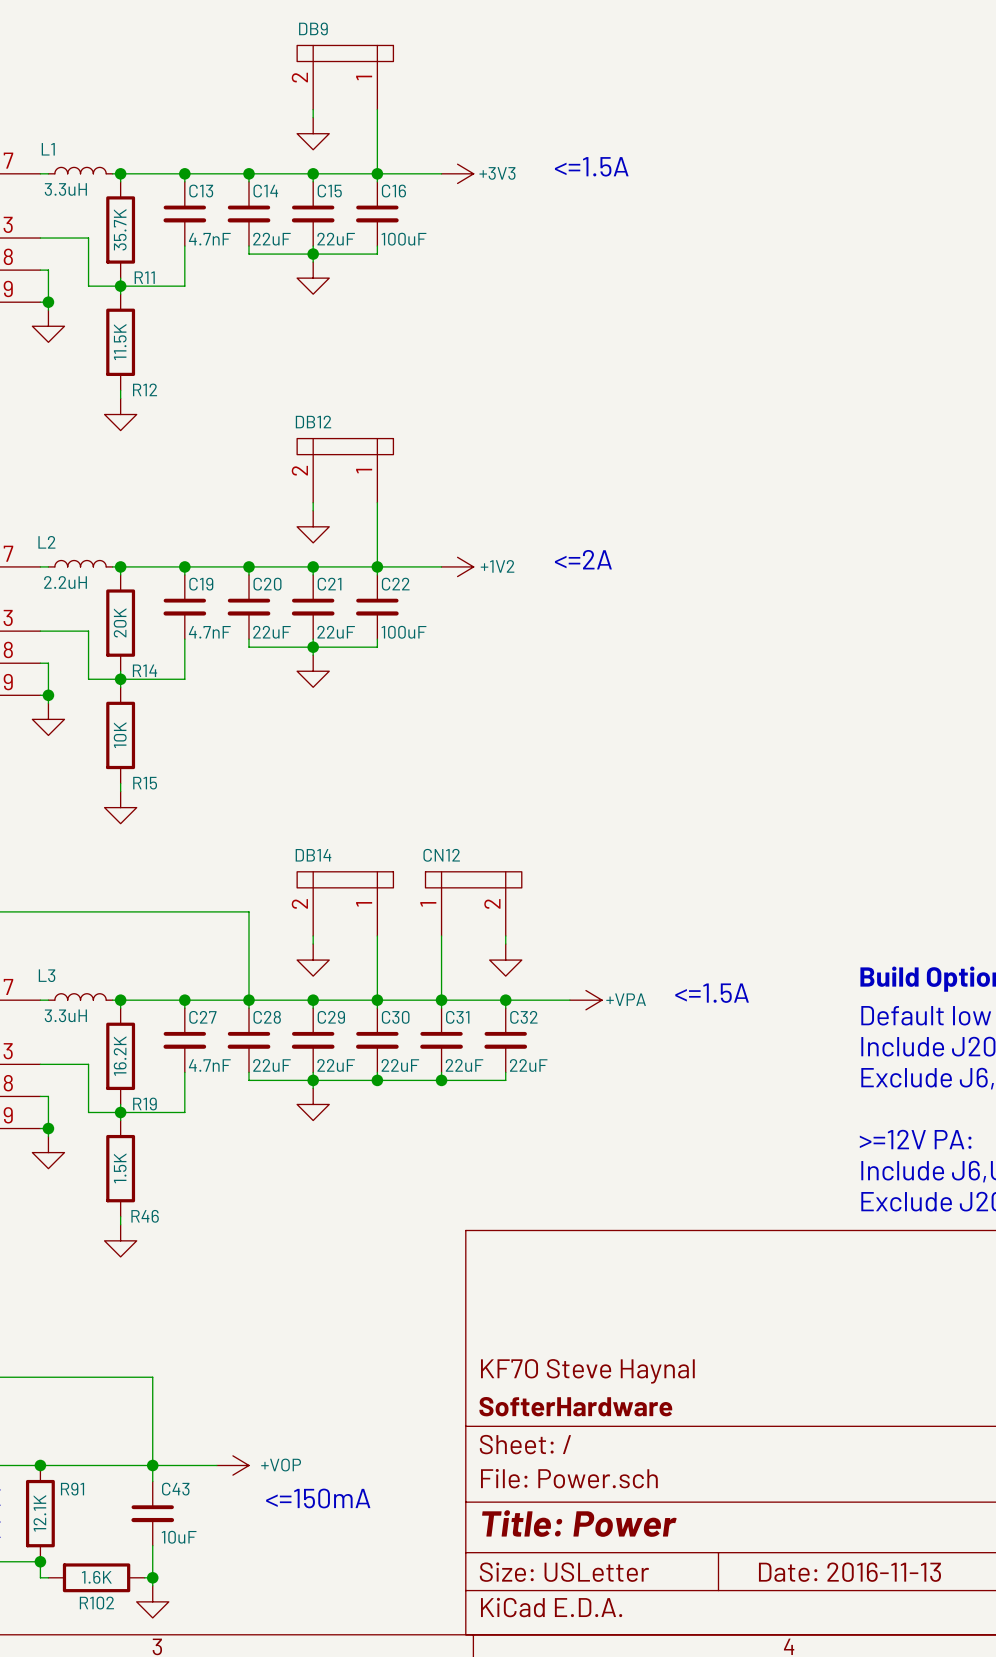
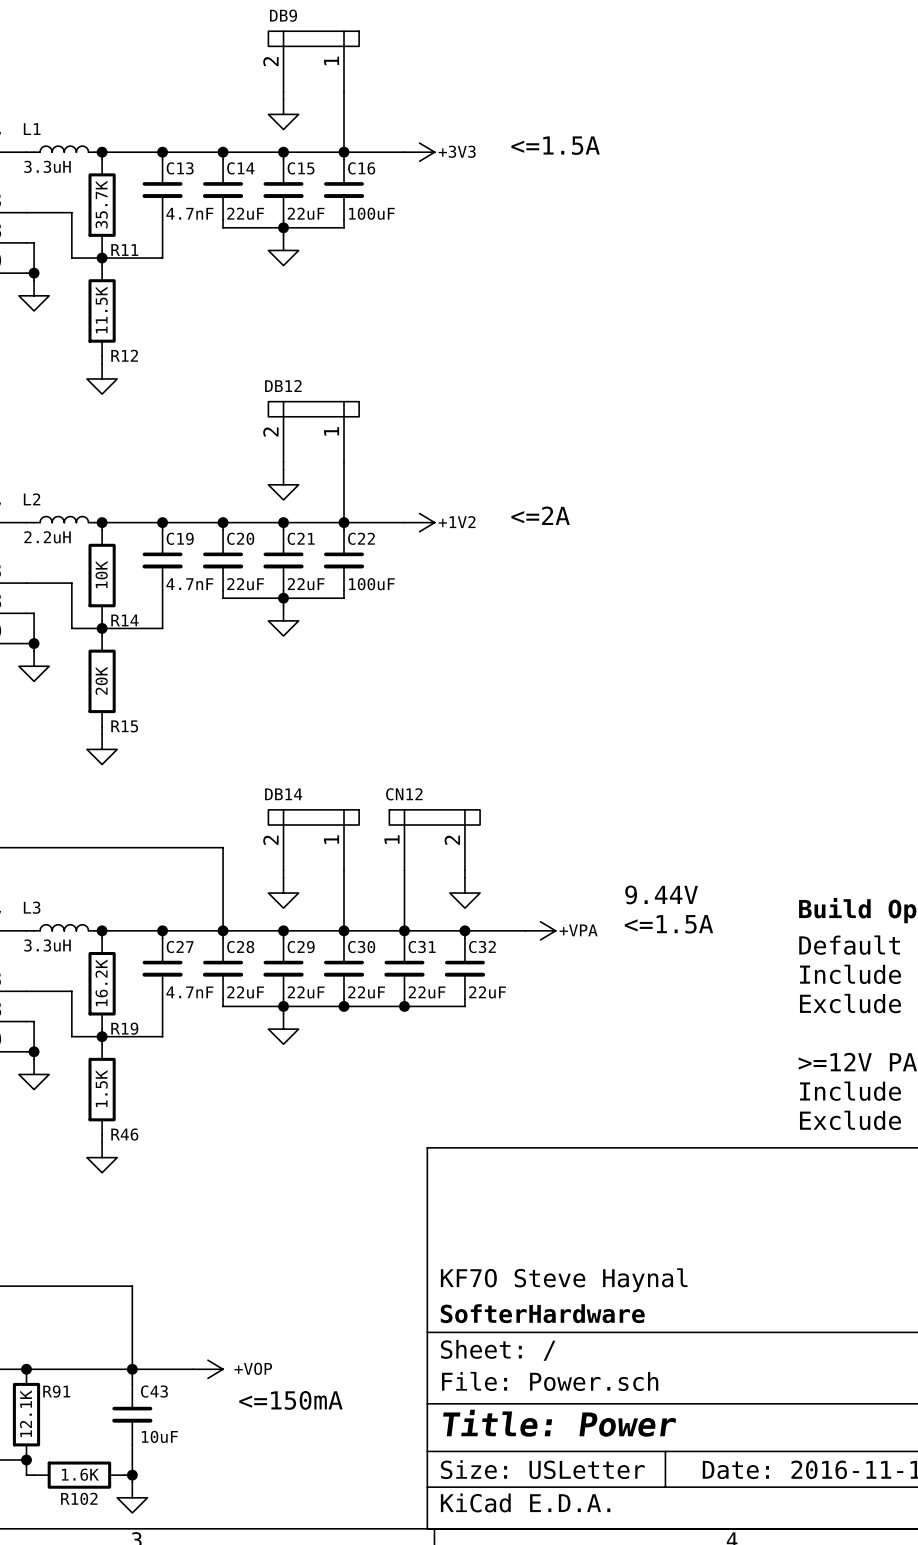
R14 value: 20K (120, 622) -> 10K (101, 574)
R15 value: 10K (120, 735) -> 20K (101, 680)
text: none -> 9.44V (661, 894)

